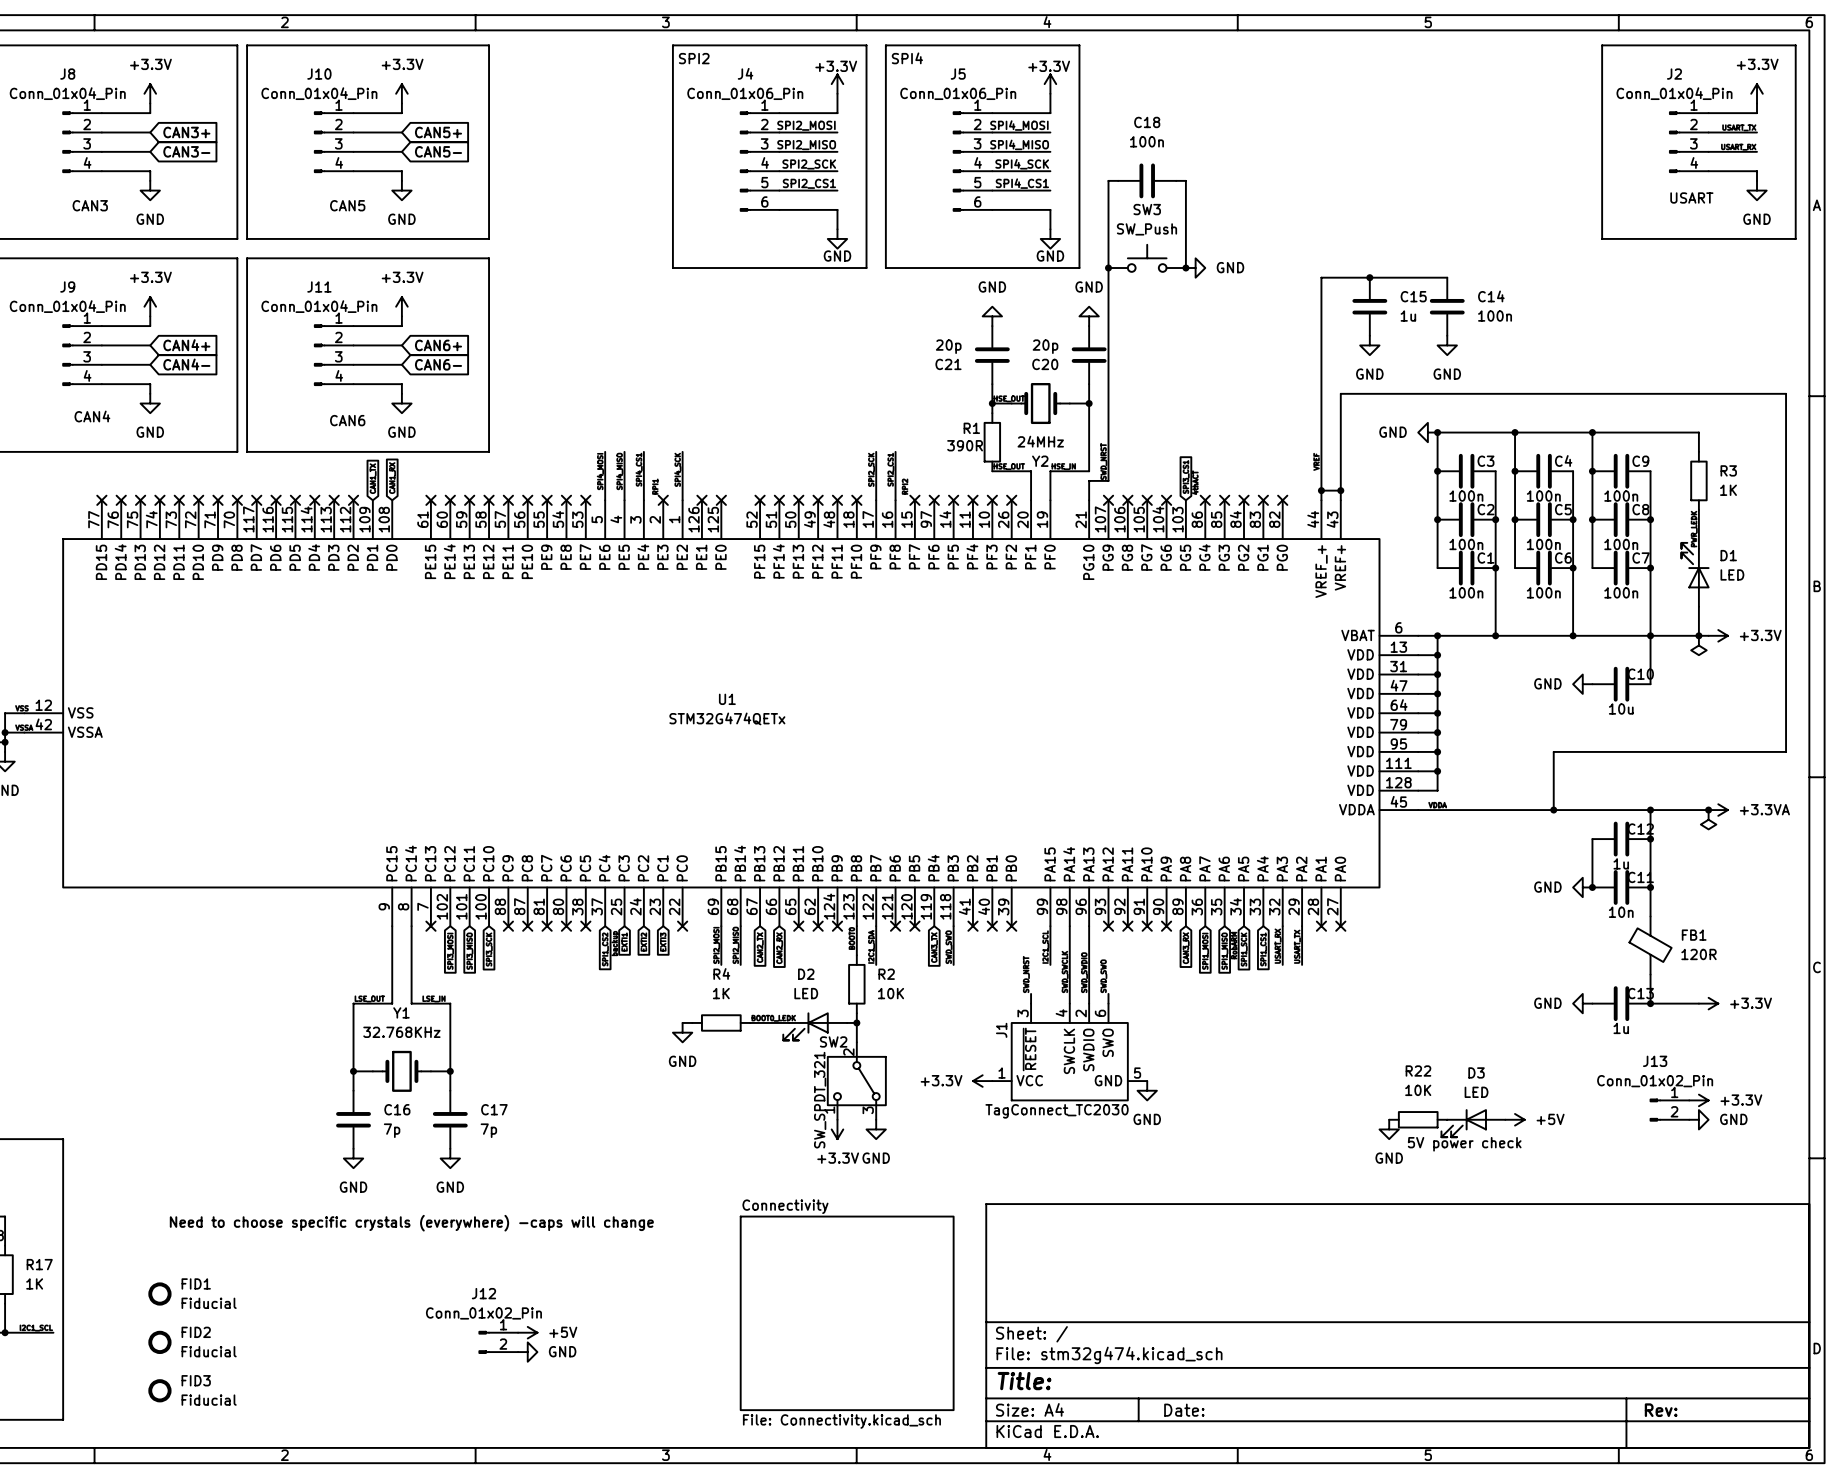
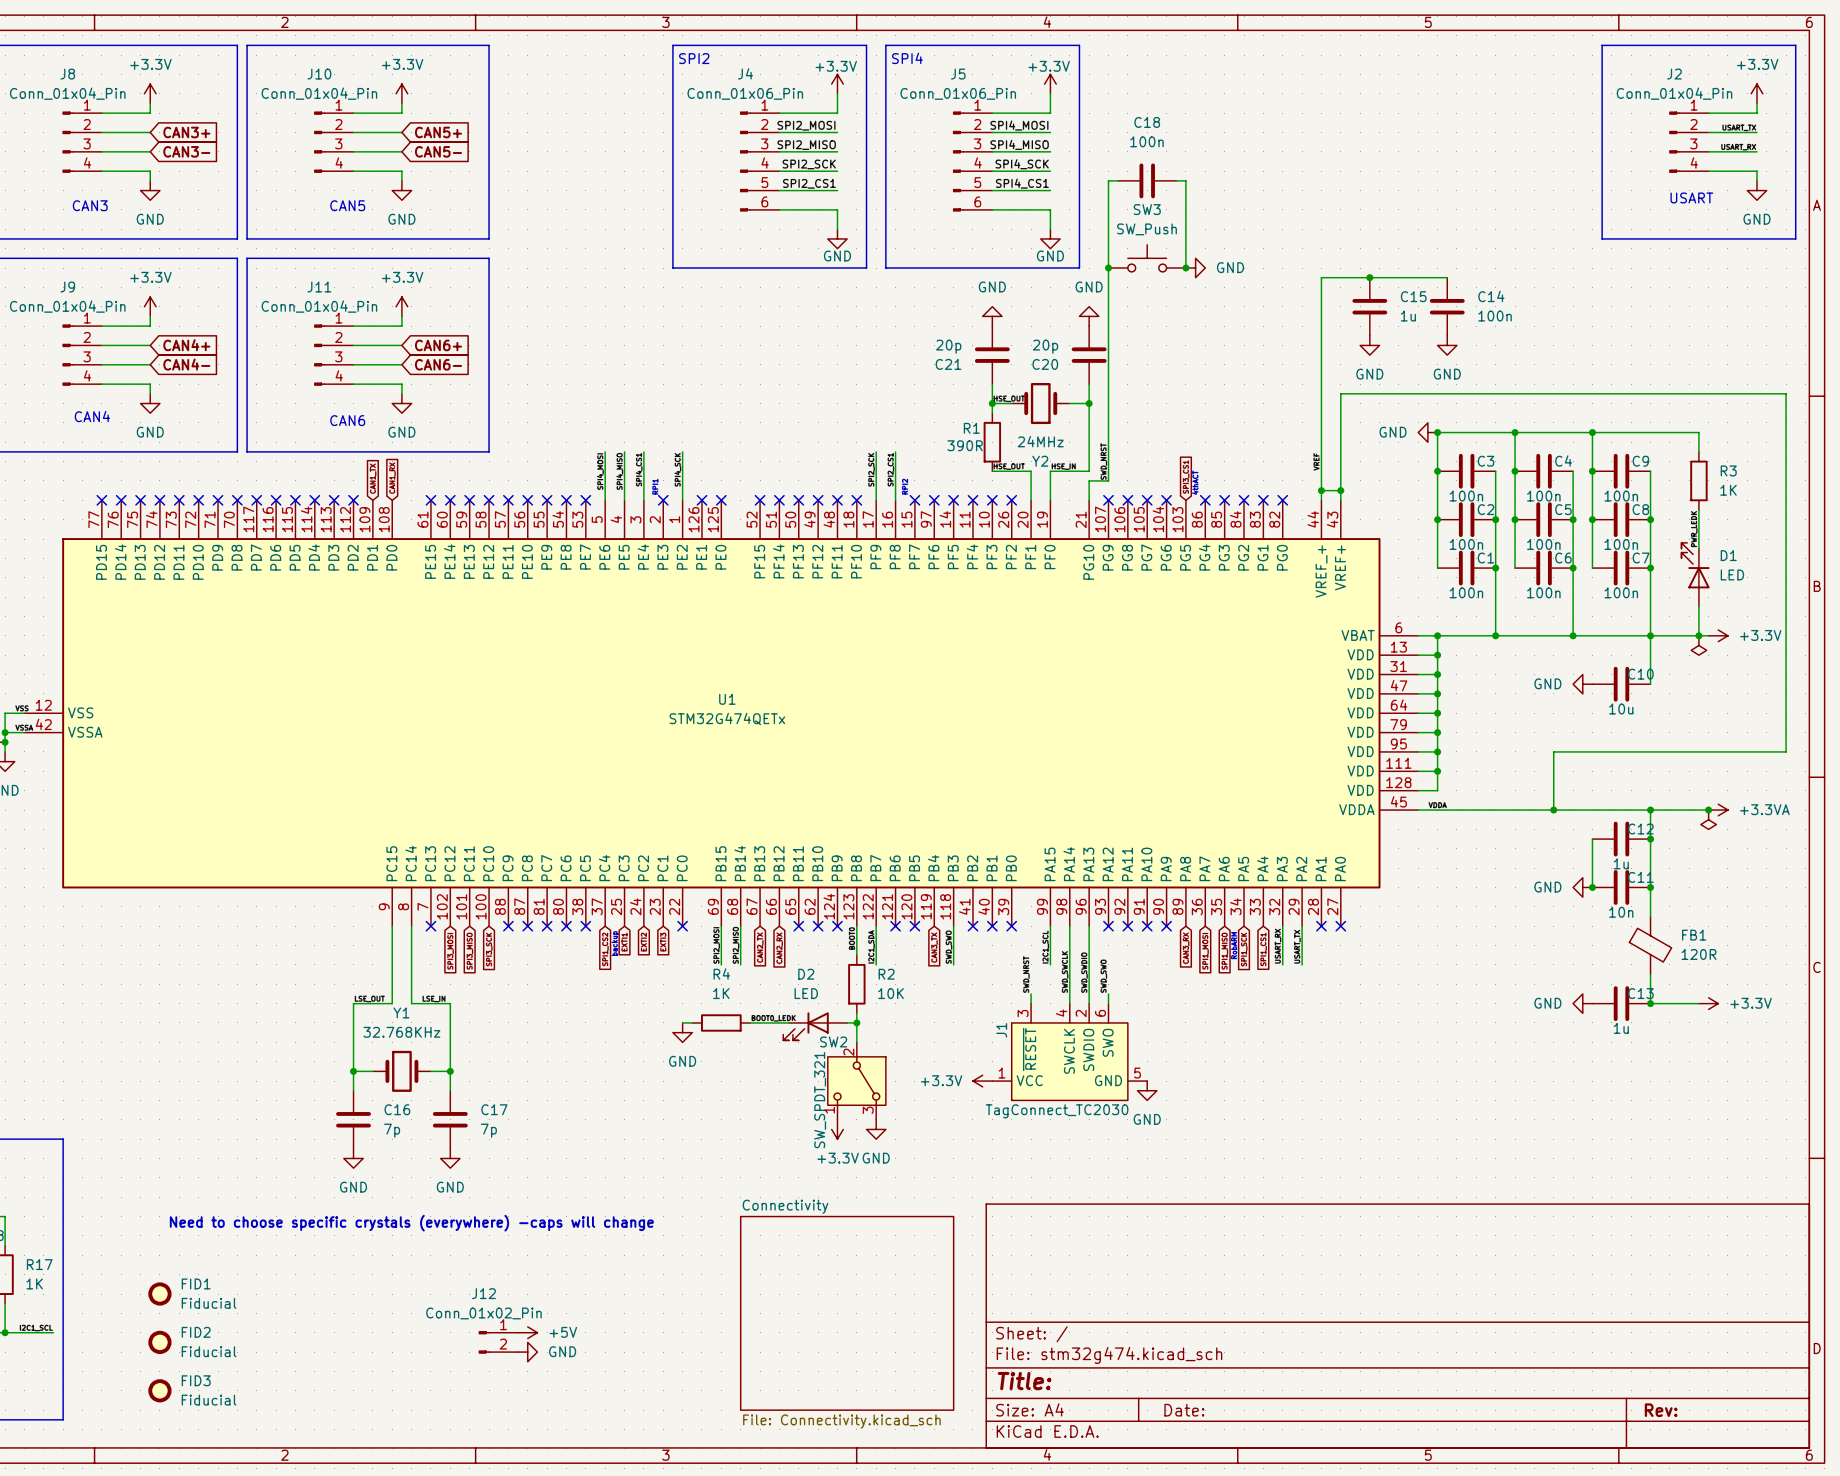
power symbol: +3.3V (1698, 1100) -> none
J13: Conn_01x02_Pin (1669, 1110) -> none
R22: 10K (1418, 1119) -> none
power symbol: +5V (1515, 1119) -> none
power symbol: GND (1698, 1119) -> none
D3: LED (1473, 1123) -> none
power symbol: GND (1389, 1129) -> none
text: 5V power check (1464, 1144) -> none

